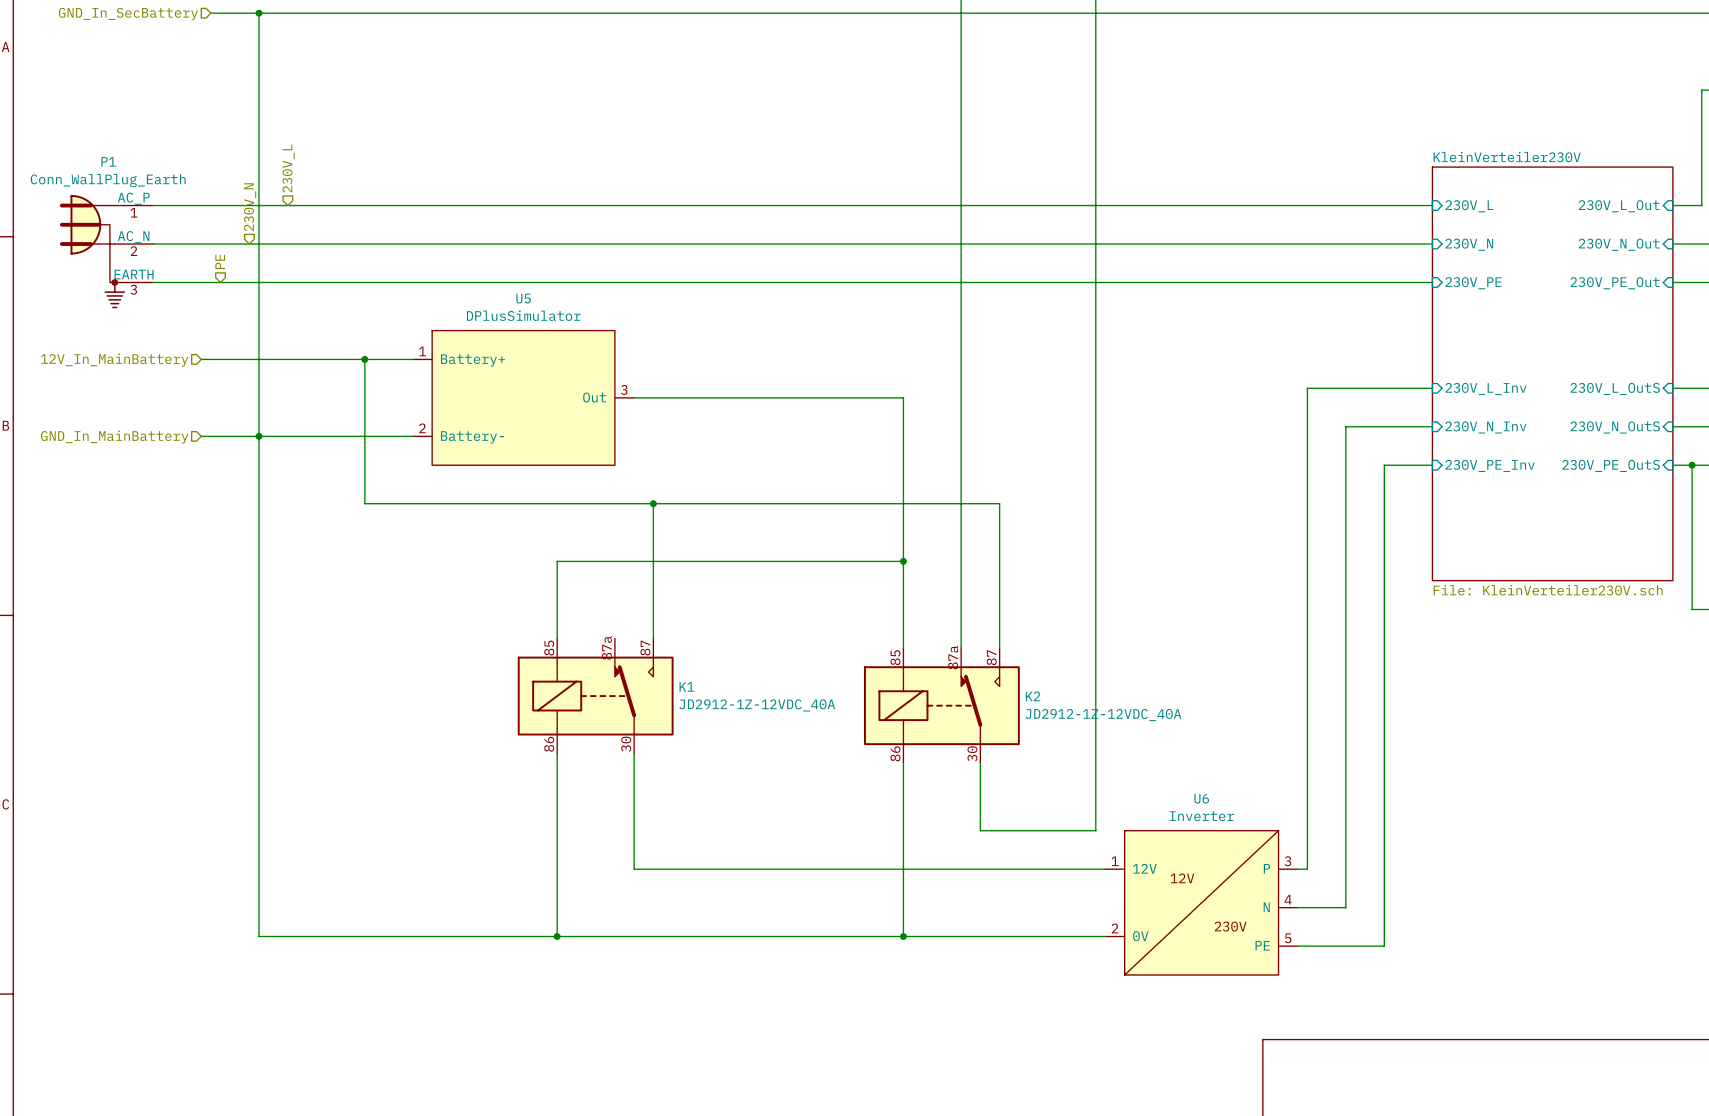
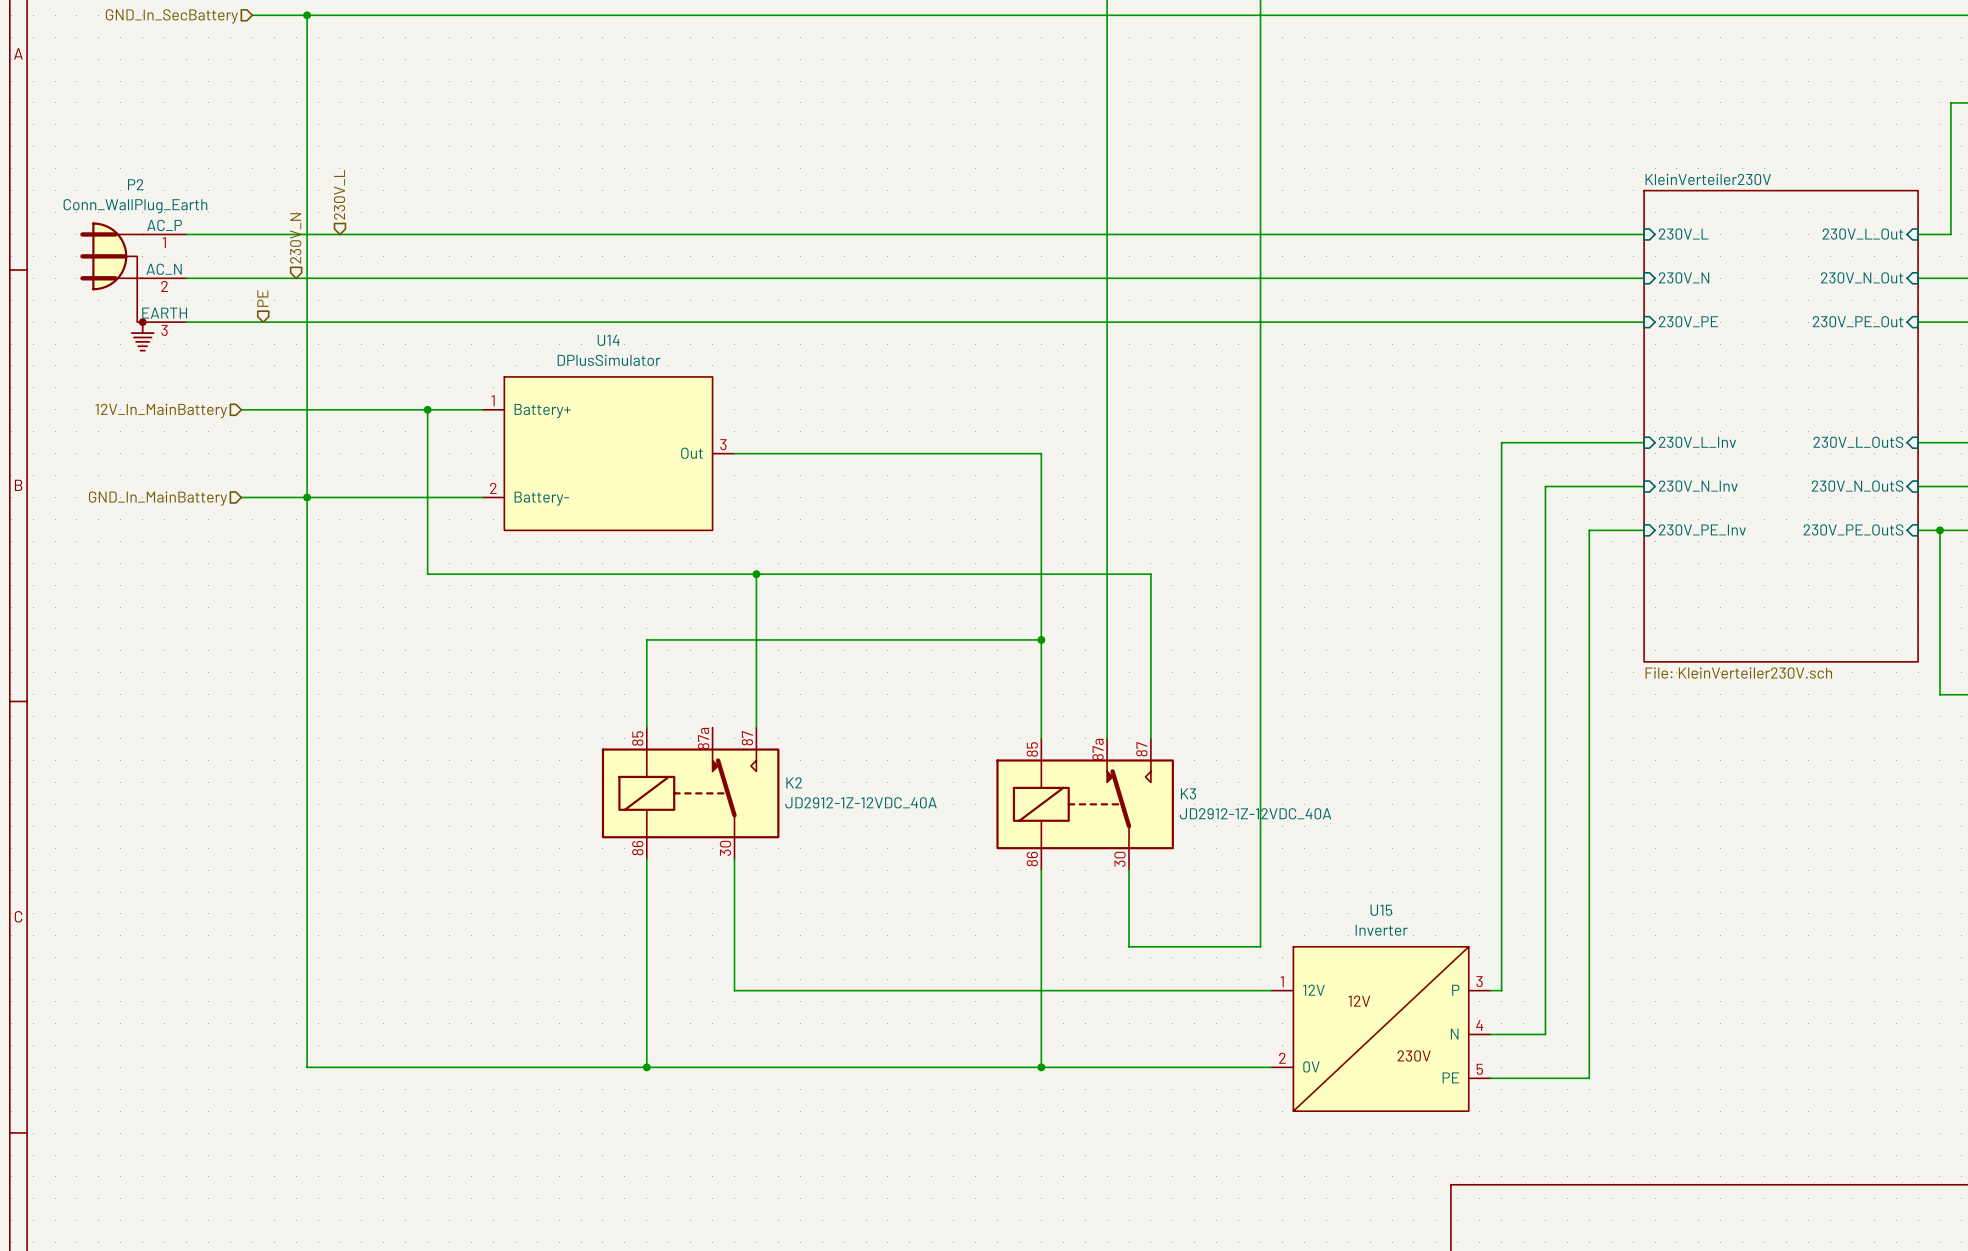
P1 name: P1 (108, 161) -> P2 (135, 184)
U5 name: U5 (523, 298) -> U14 (608, 340)
K1 name: K1 (686, 686) -> K2 (794, 782)
K2 name: K2 (1033, 696) -> K3 (1188, 793)
U6 name: U6 (1201, 798) -> U15 (1381, 910)

